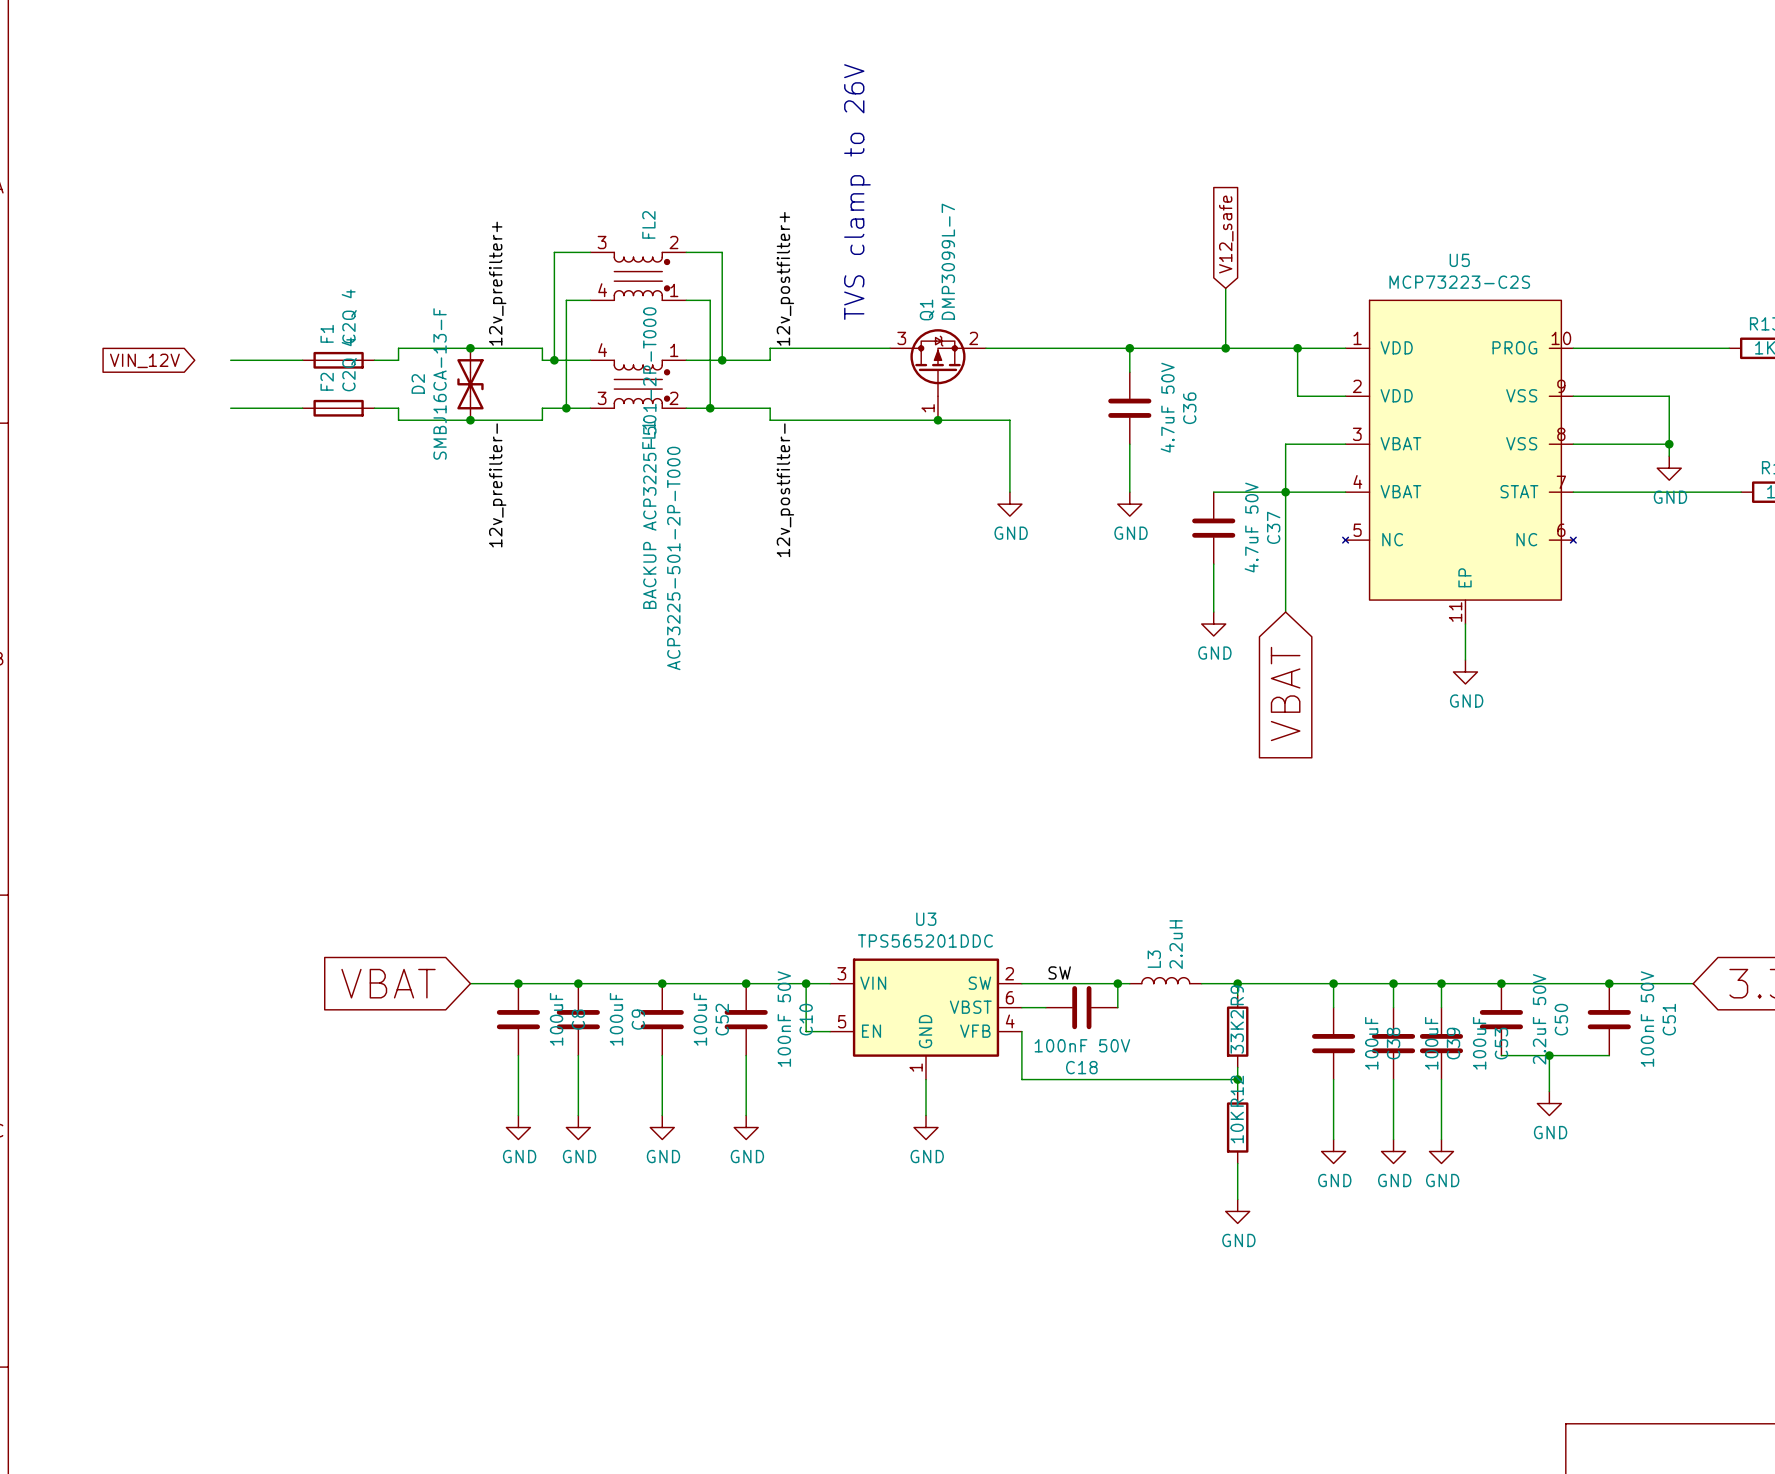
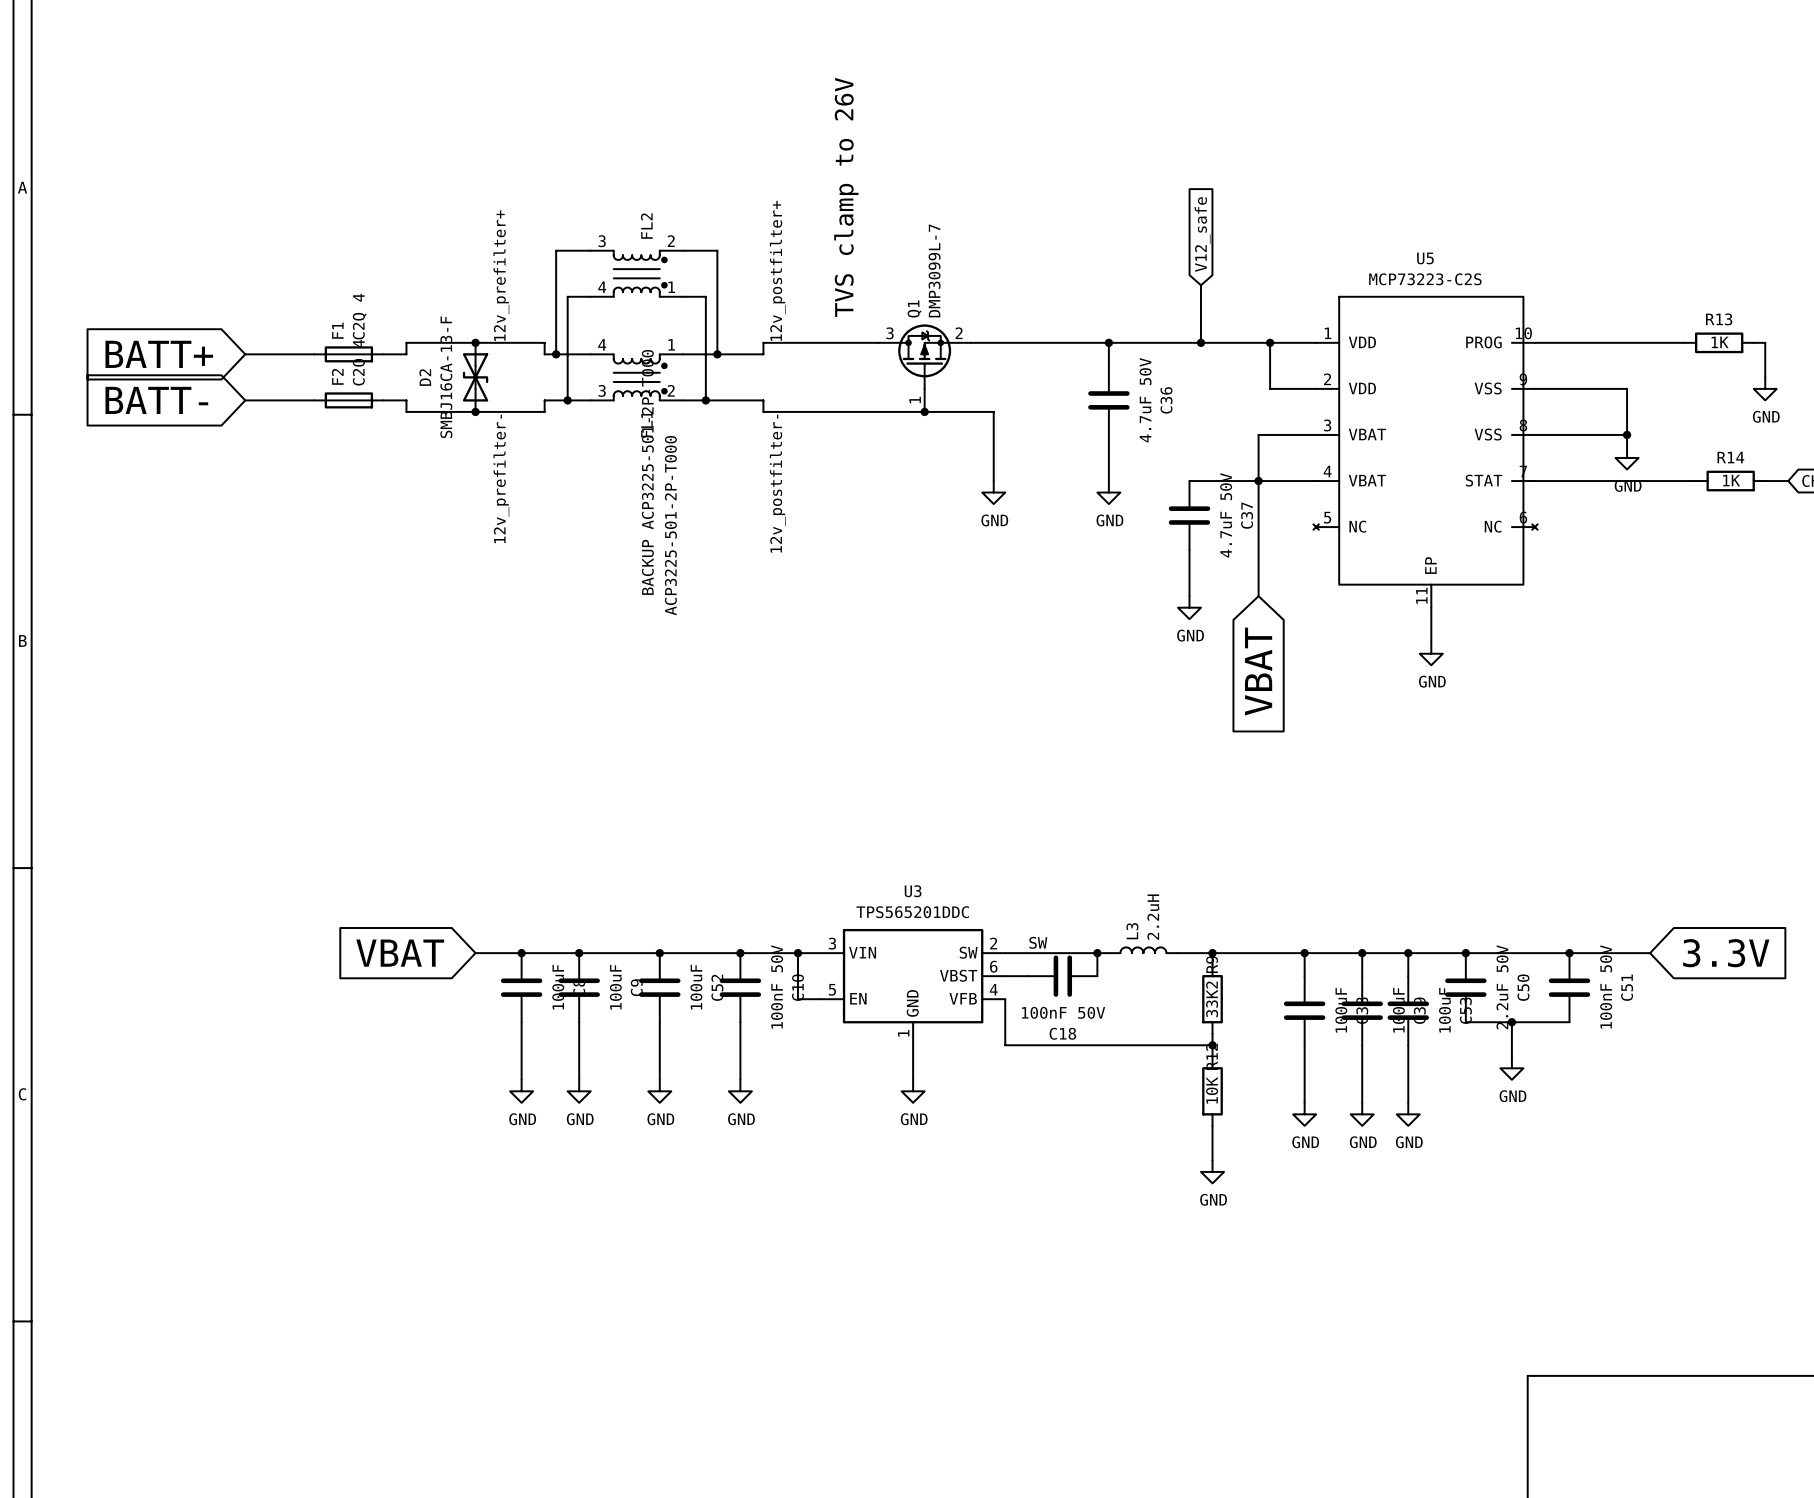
global label: none -> BATT+ (159, 354)
global label: VIN_12V (144, 360) -> none
global label: none -> BATT- (156, 400)

